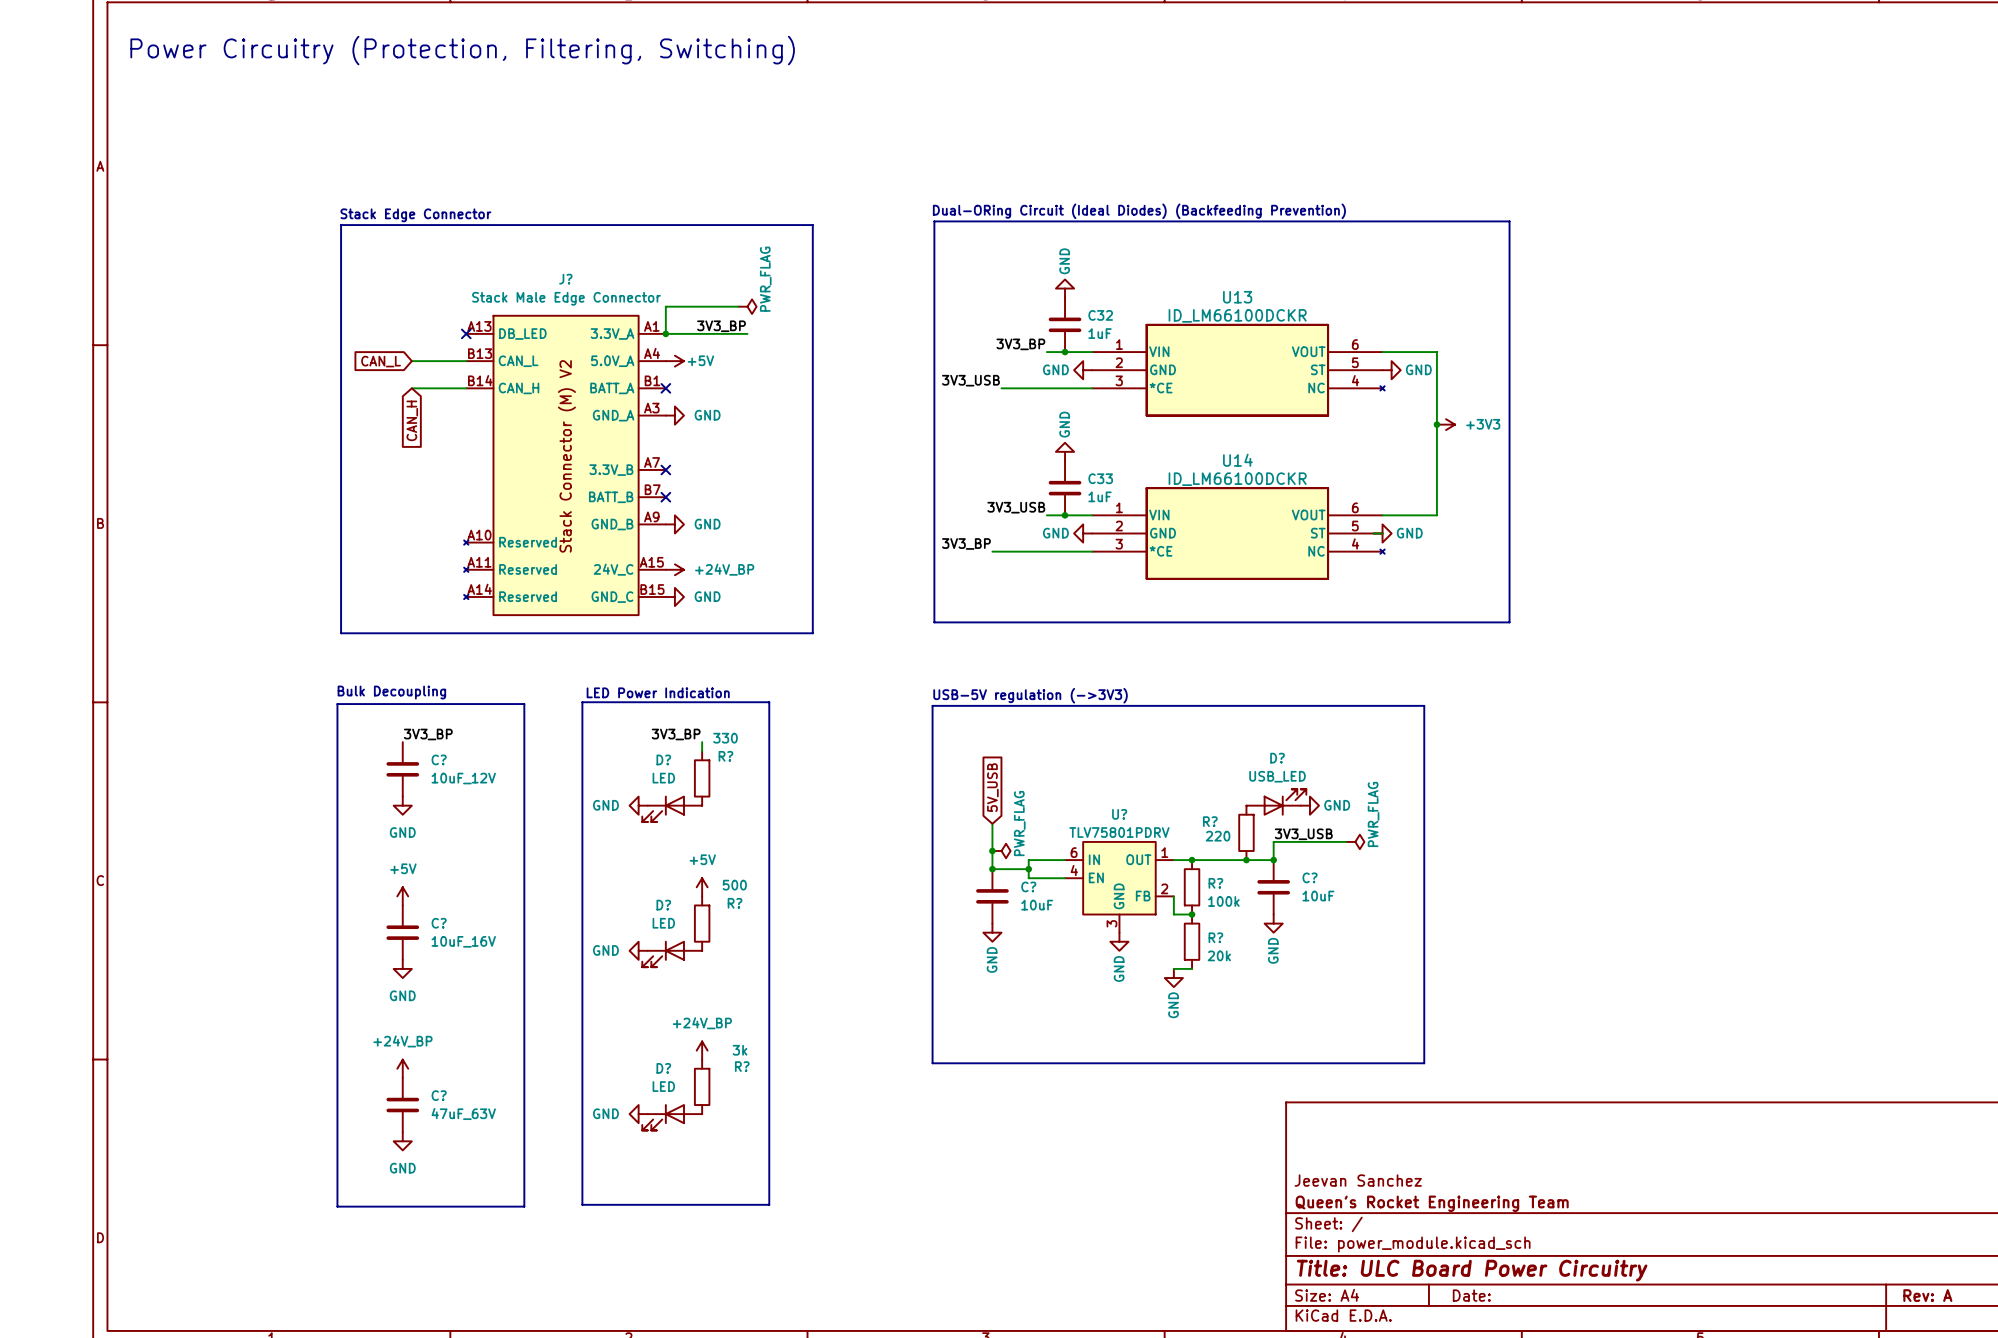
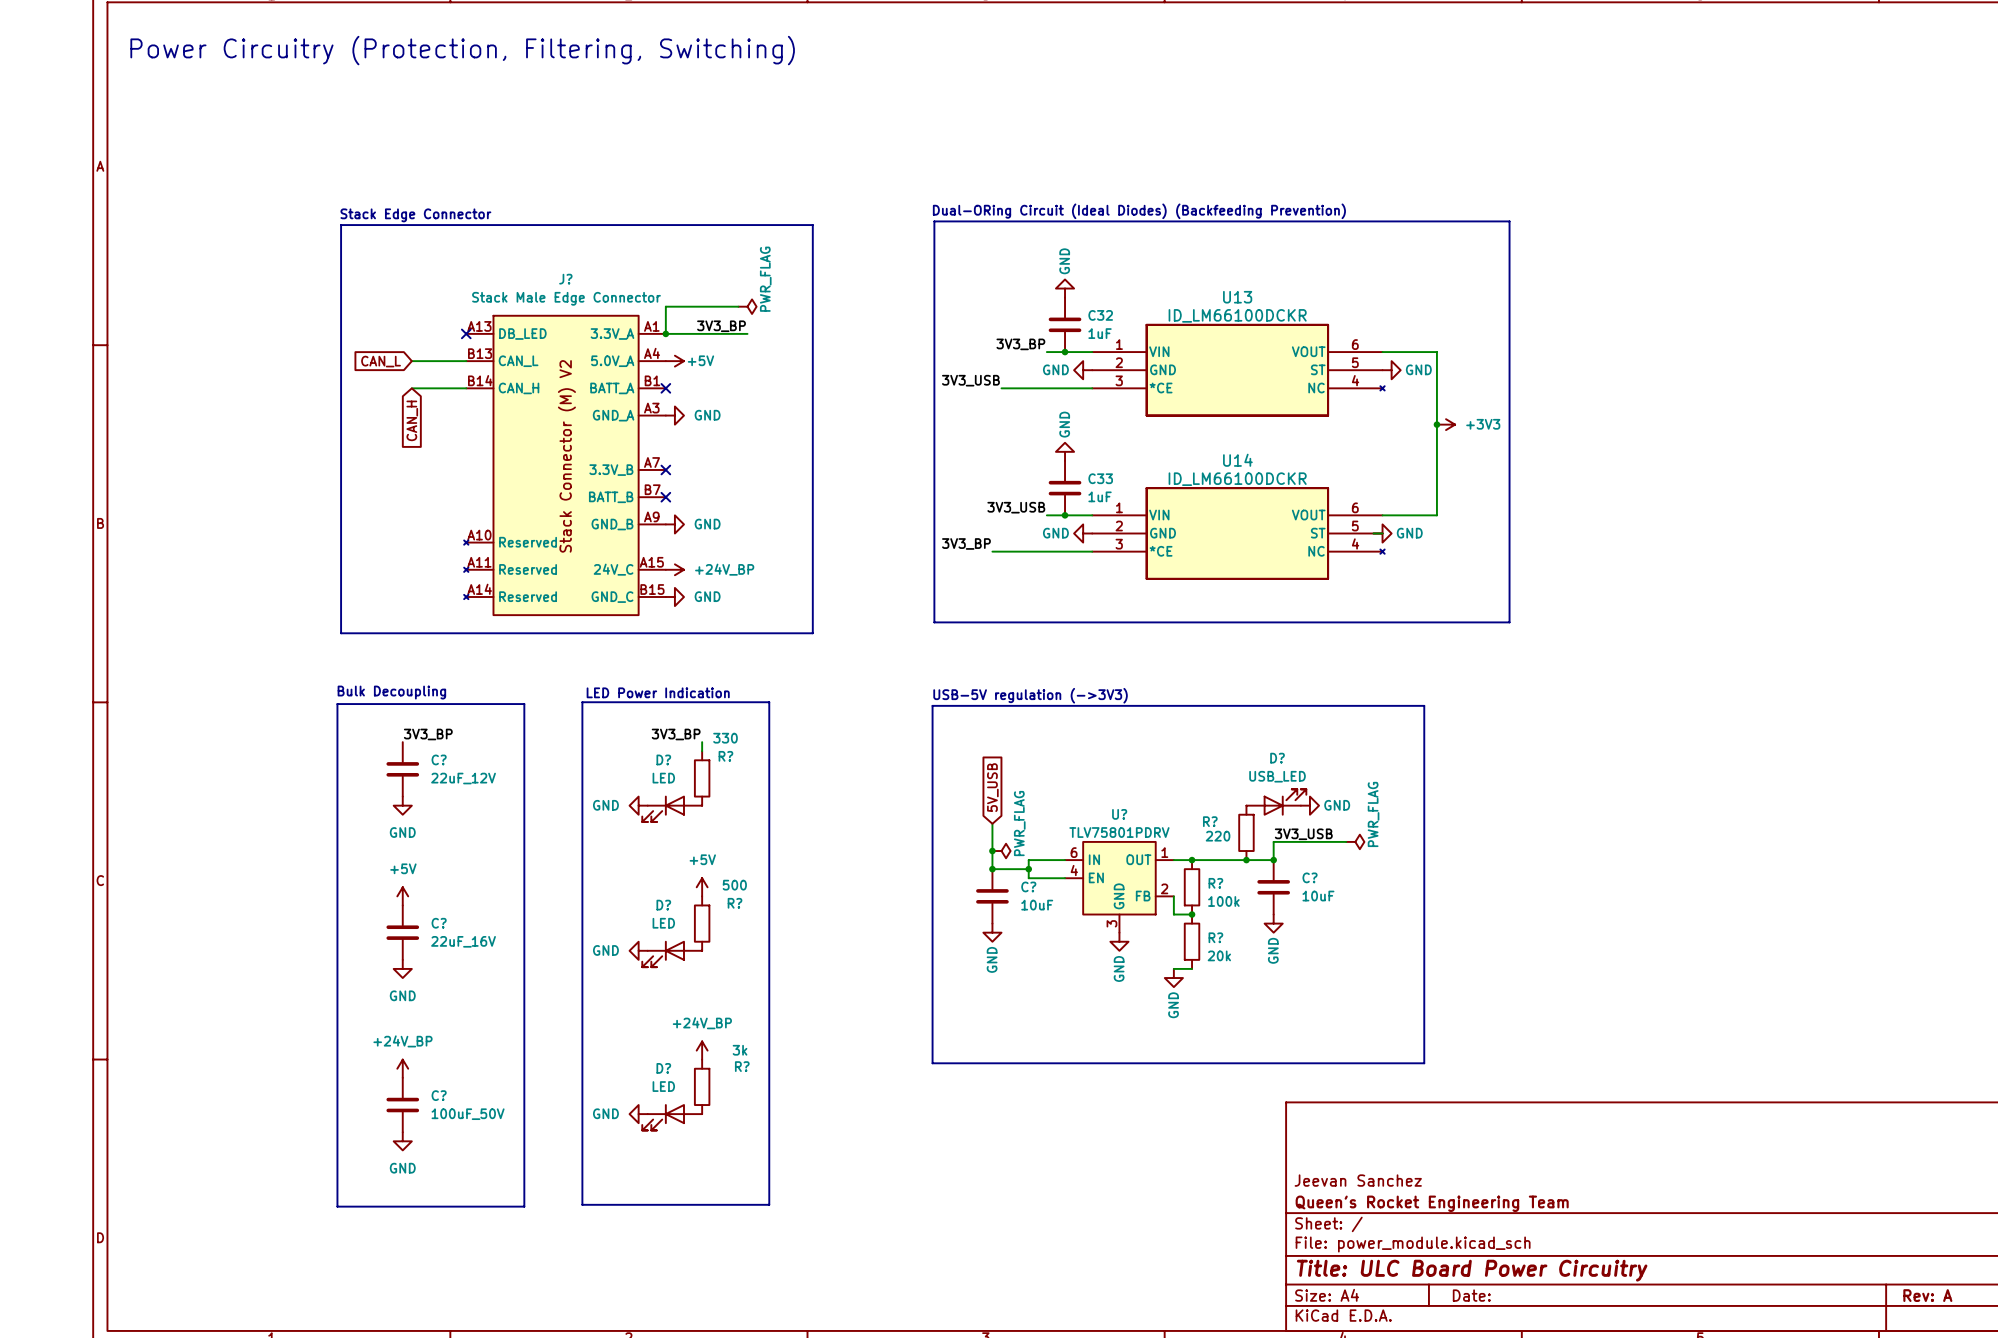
C? value: 10uF_12V (463, 778) -> 22uF_12V (463, 778)
C? value: 10uF_16V (463, 941) -> 22uF_16V (463, 941)
C? value: 47uF_63V (463, 1113) -> 100uF_50V (468, 1114)

